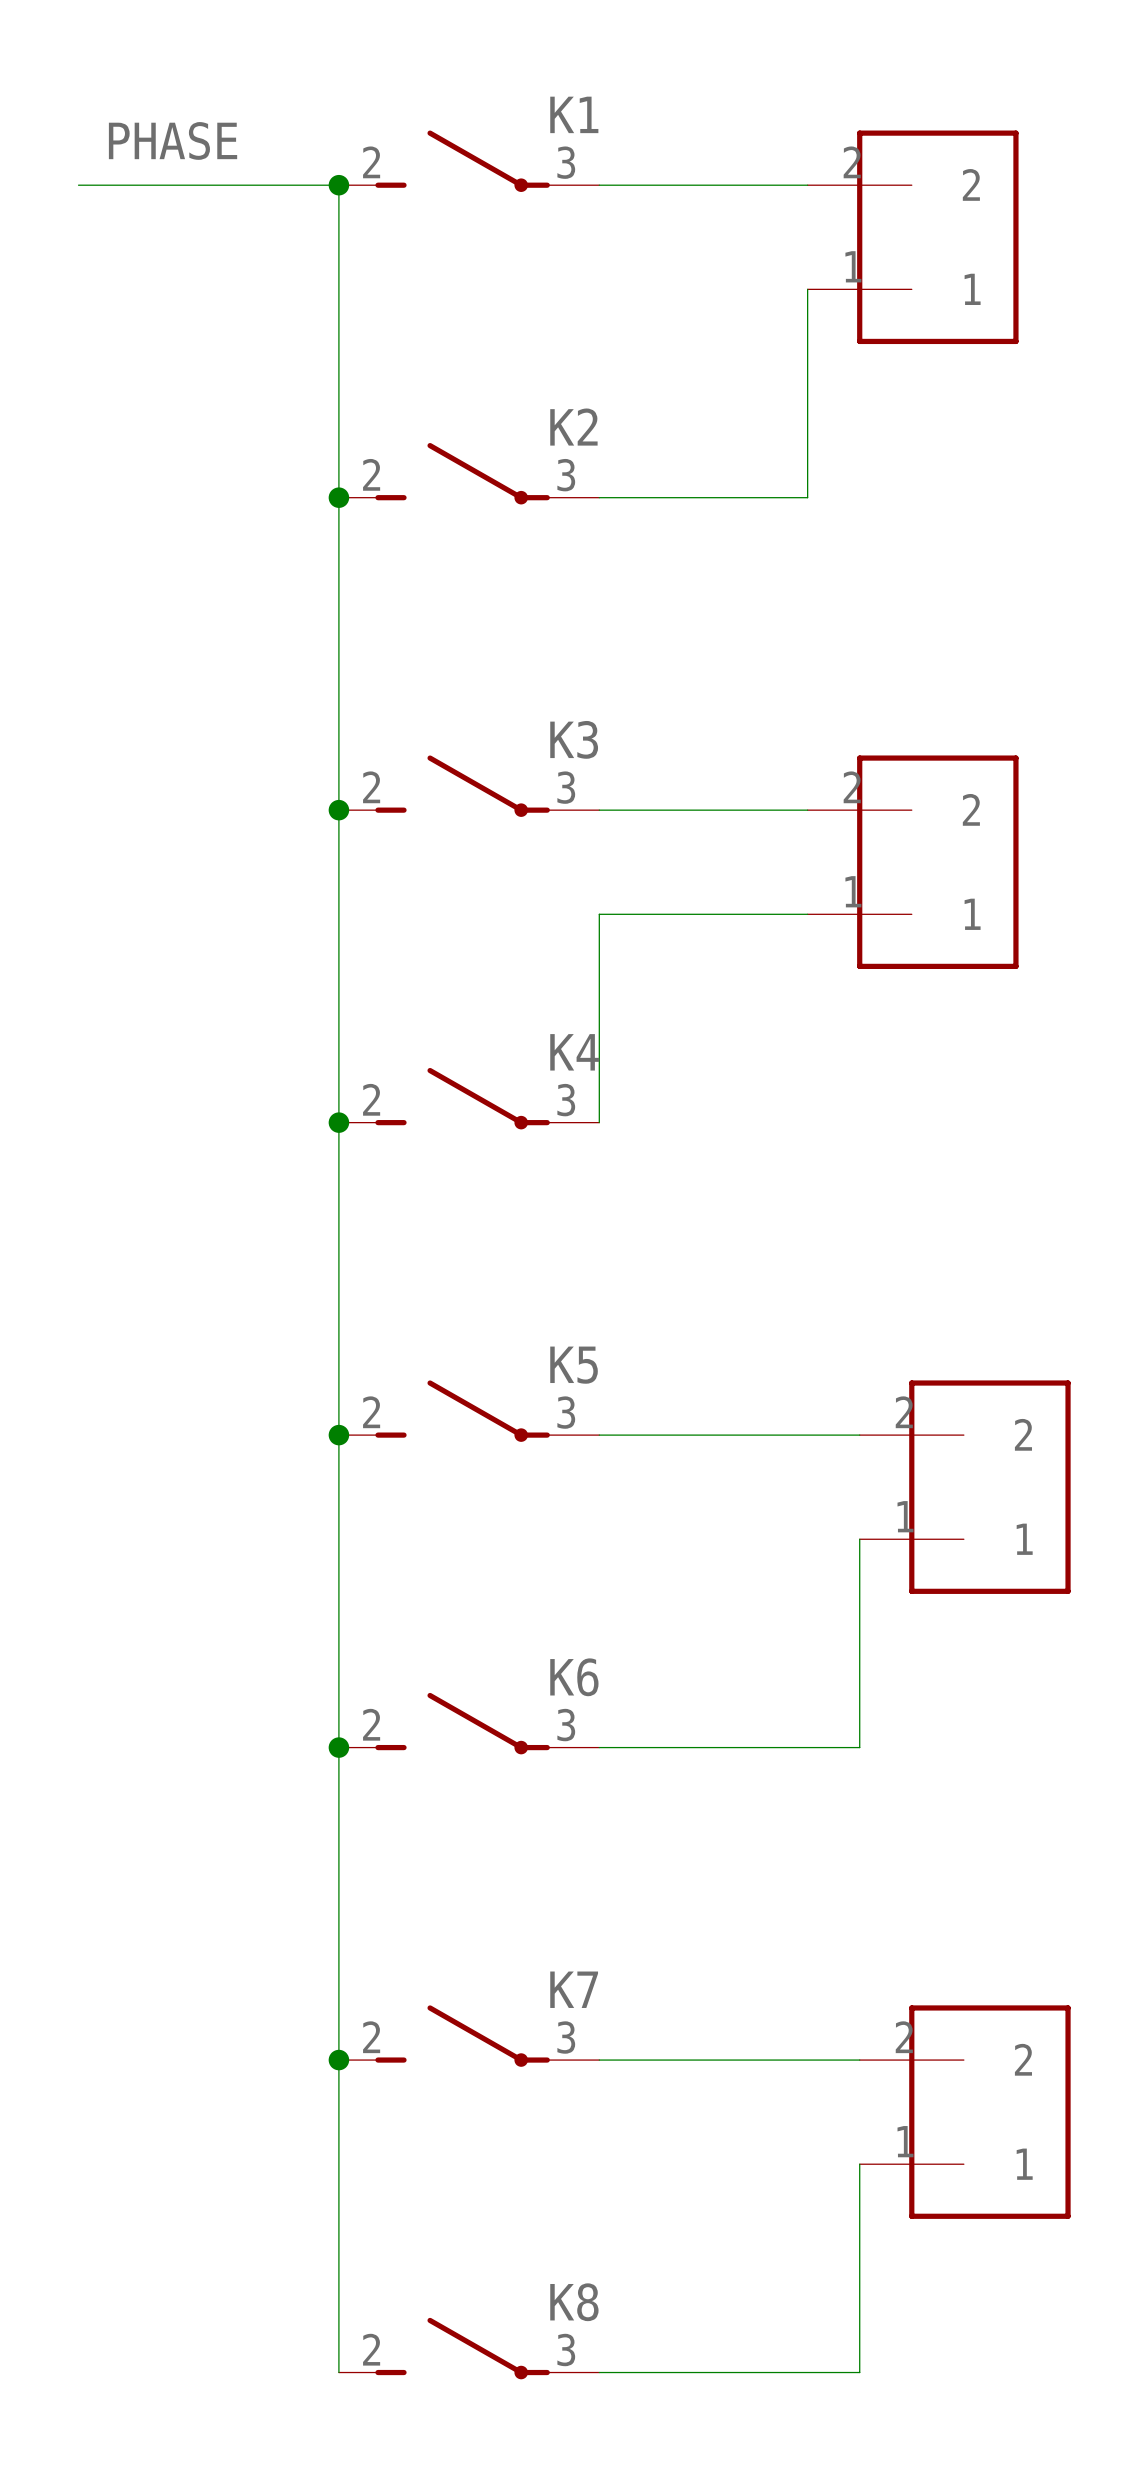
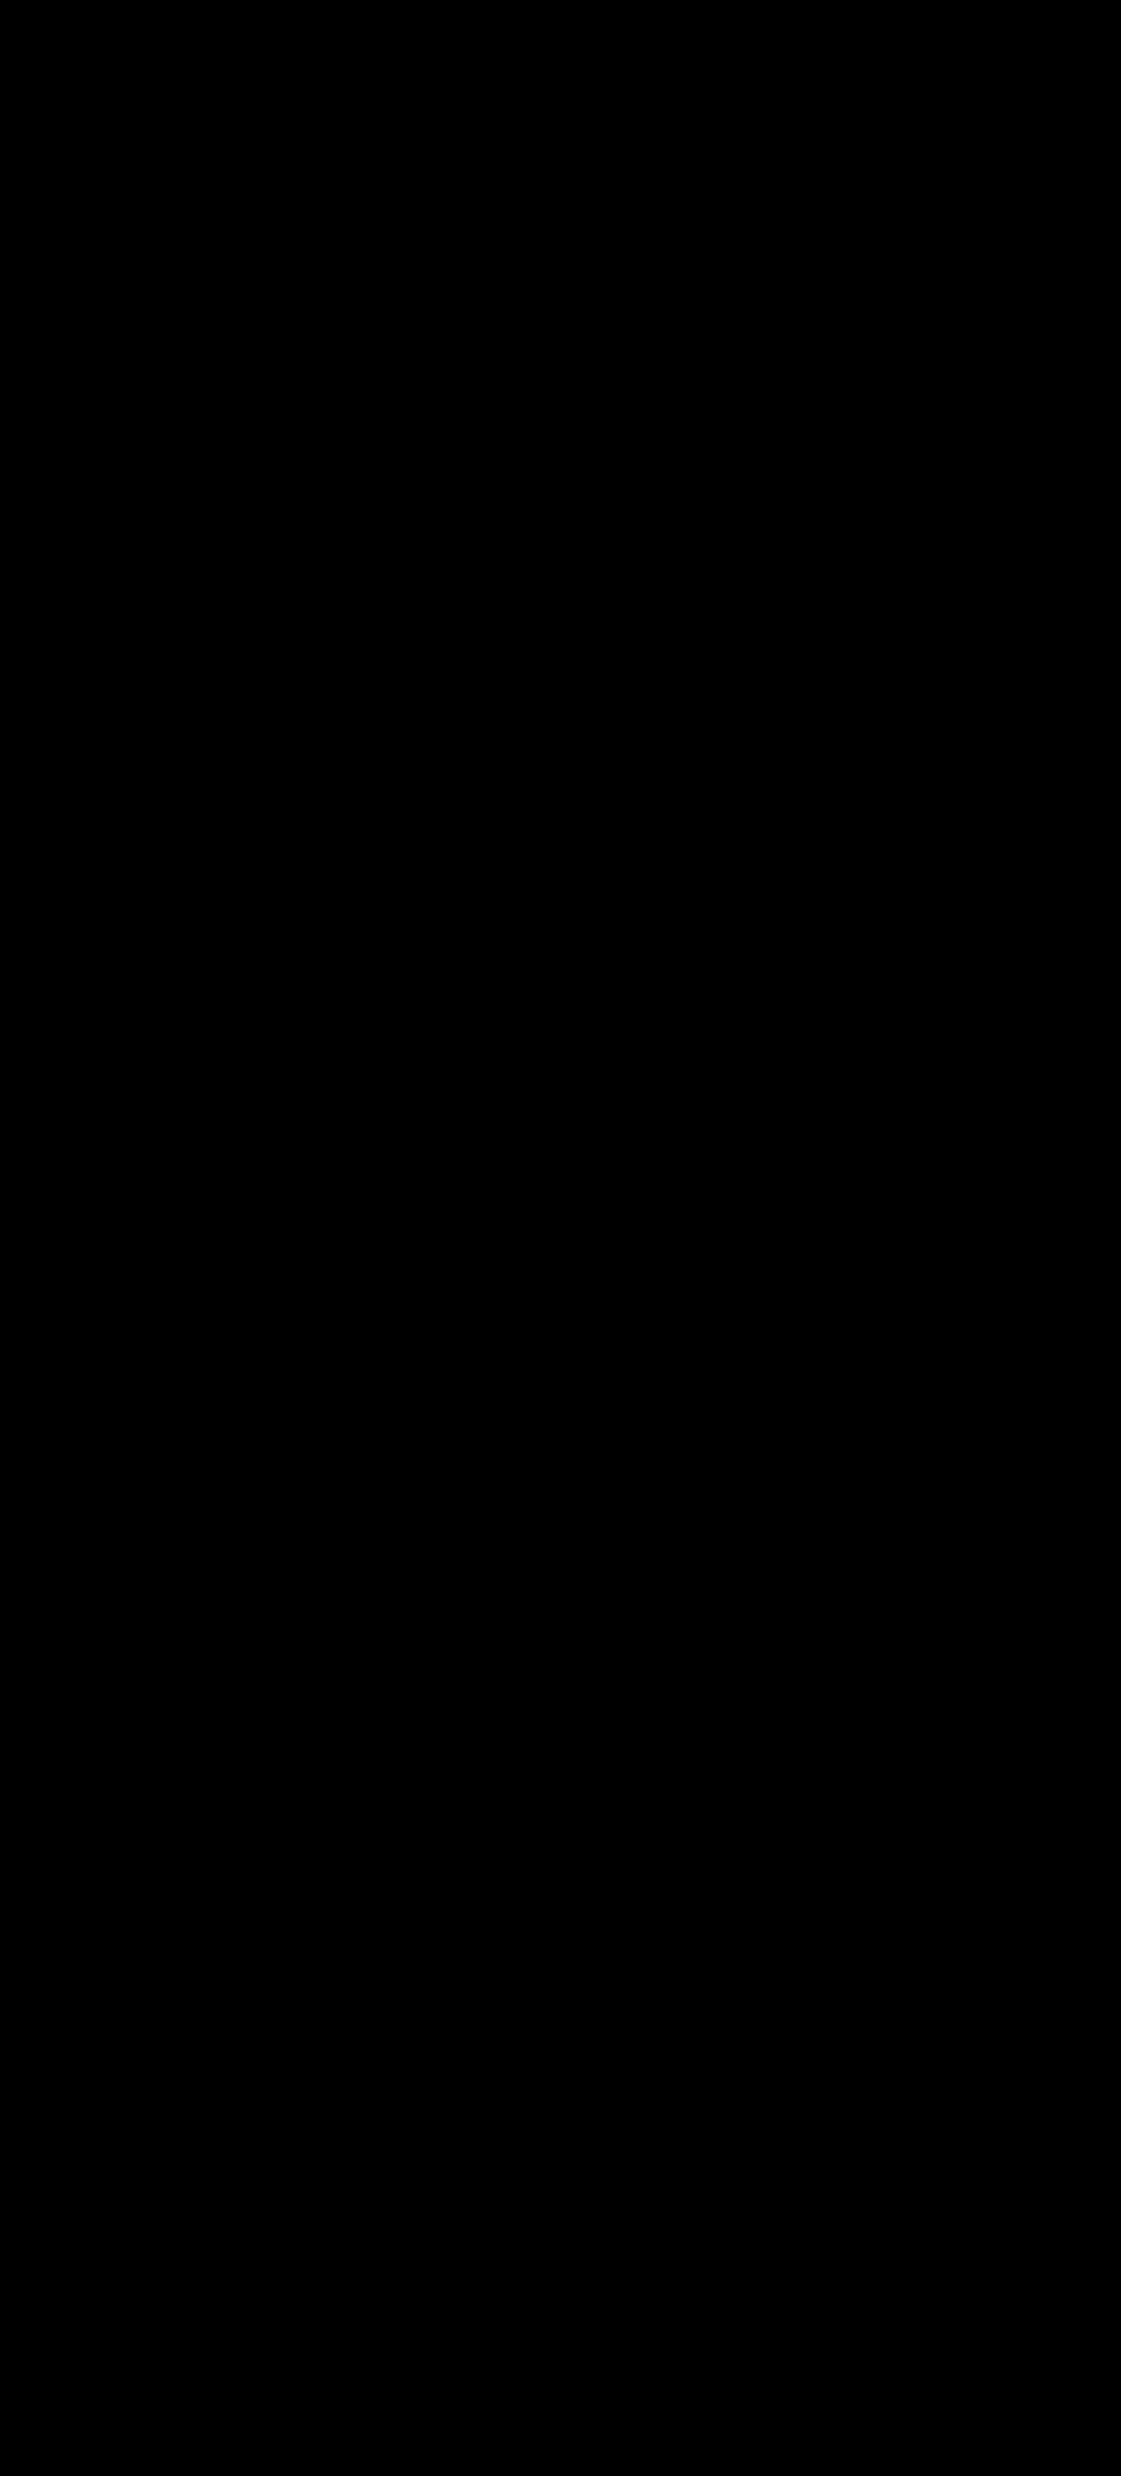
label: PHASE (173, 140) -> none
K1: (469, 161) -> none
wire: (78, 185) (338, 185) (338, 2372) -> none
junction: (338, 185) -> none
wire: (599, 185) (807, 185) -> none
part: (913, 237) -> none
wire: (807, 289) (807, 497) (599, 497) -> none
K2: (469, 473) -> none
junction: (338, 497) -> none
K3: (469, 786) -> none
junction: (338, 810) -> none
wire: (599, 810) (807, 810) -> none
part: (913, 862) -> none
wire: (807, 914) (599, 914) (599, 1122) -> none
K4: (469, 1098) -> none
junction: (338, 1122) -> none
K5: (469, 1411) -> none
junction: (338, 1435) -> none
wire: (599, 1435) (859, 1435) -> none
part: (965, 1487) -> none
wire: (859, 1539) (859, 1747) (599, 1747) -> none
K6: (469, 1723) -> none
junction: (338, 1747) -> none
K7: (469, 2036) -> none
junction: (338, 2060) -> none
wire: (599, 2060) (859, 2060) -> none
part: (965, 2112) -> none
wire: (859, 2164) (859, 2372) (599, 2372) -> none
K8: (469, 2348) -> none

